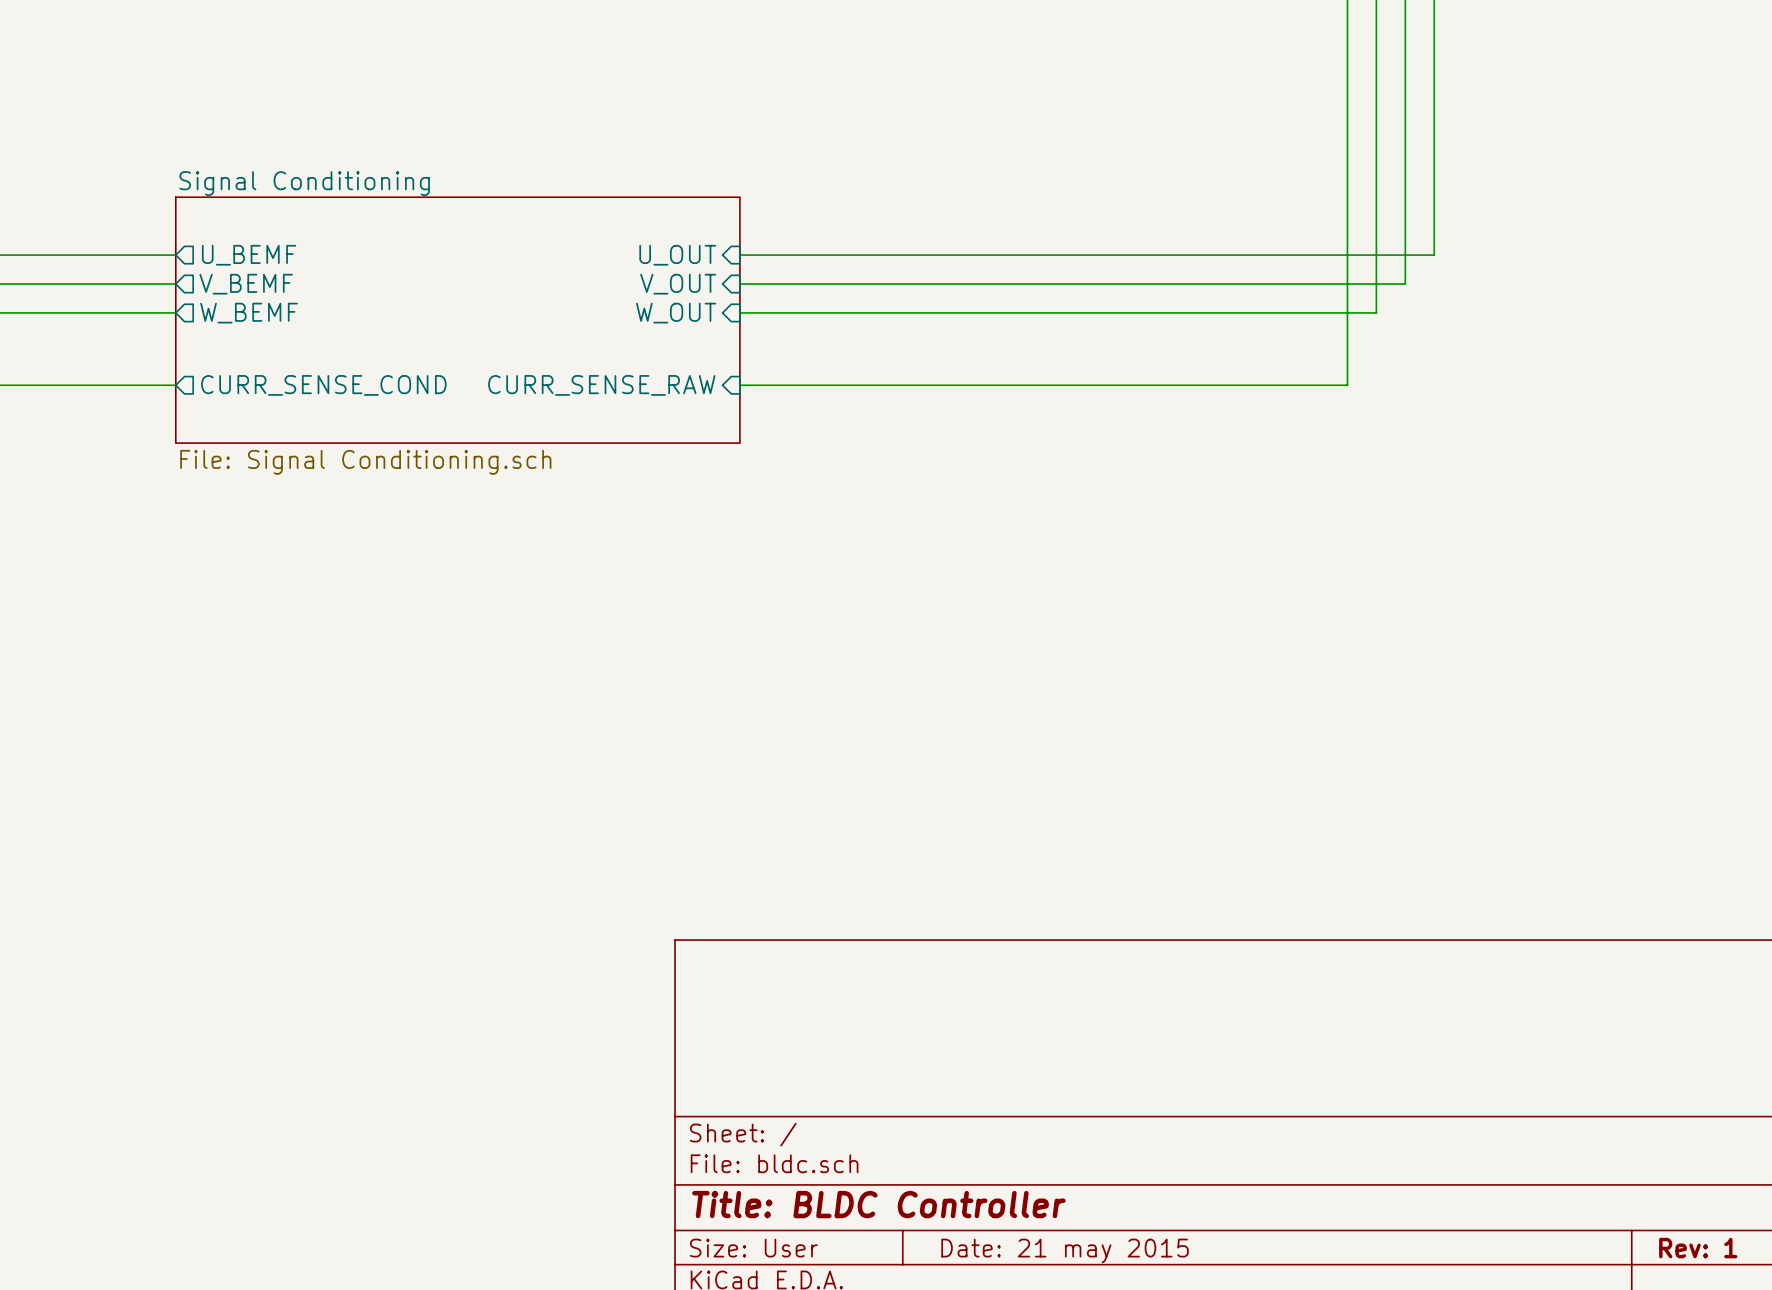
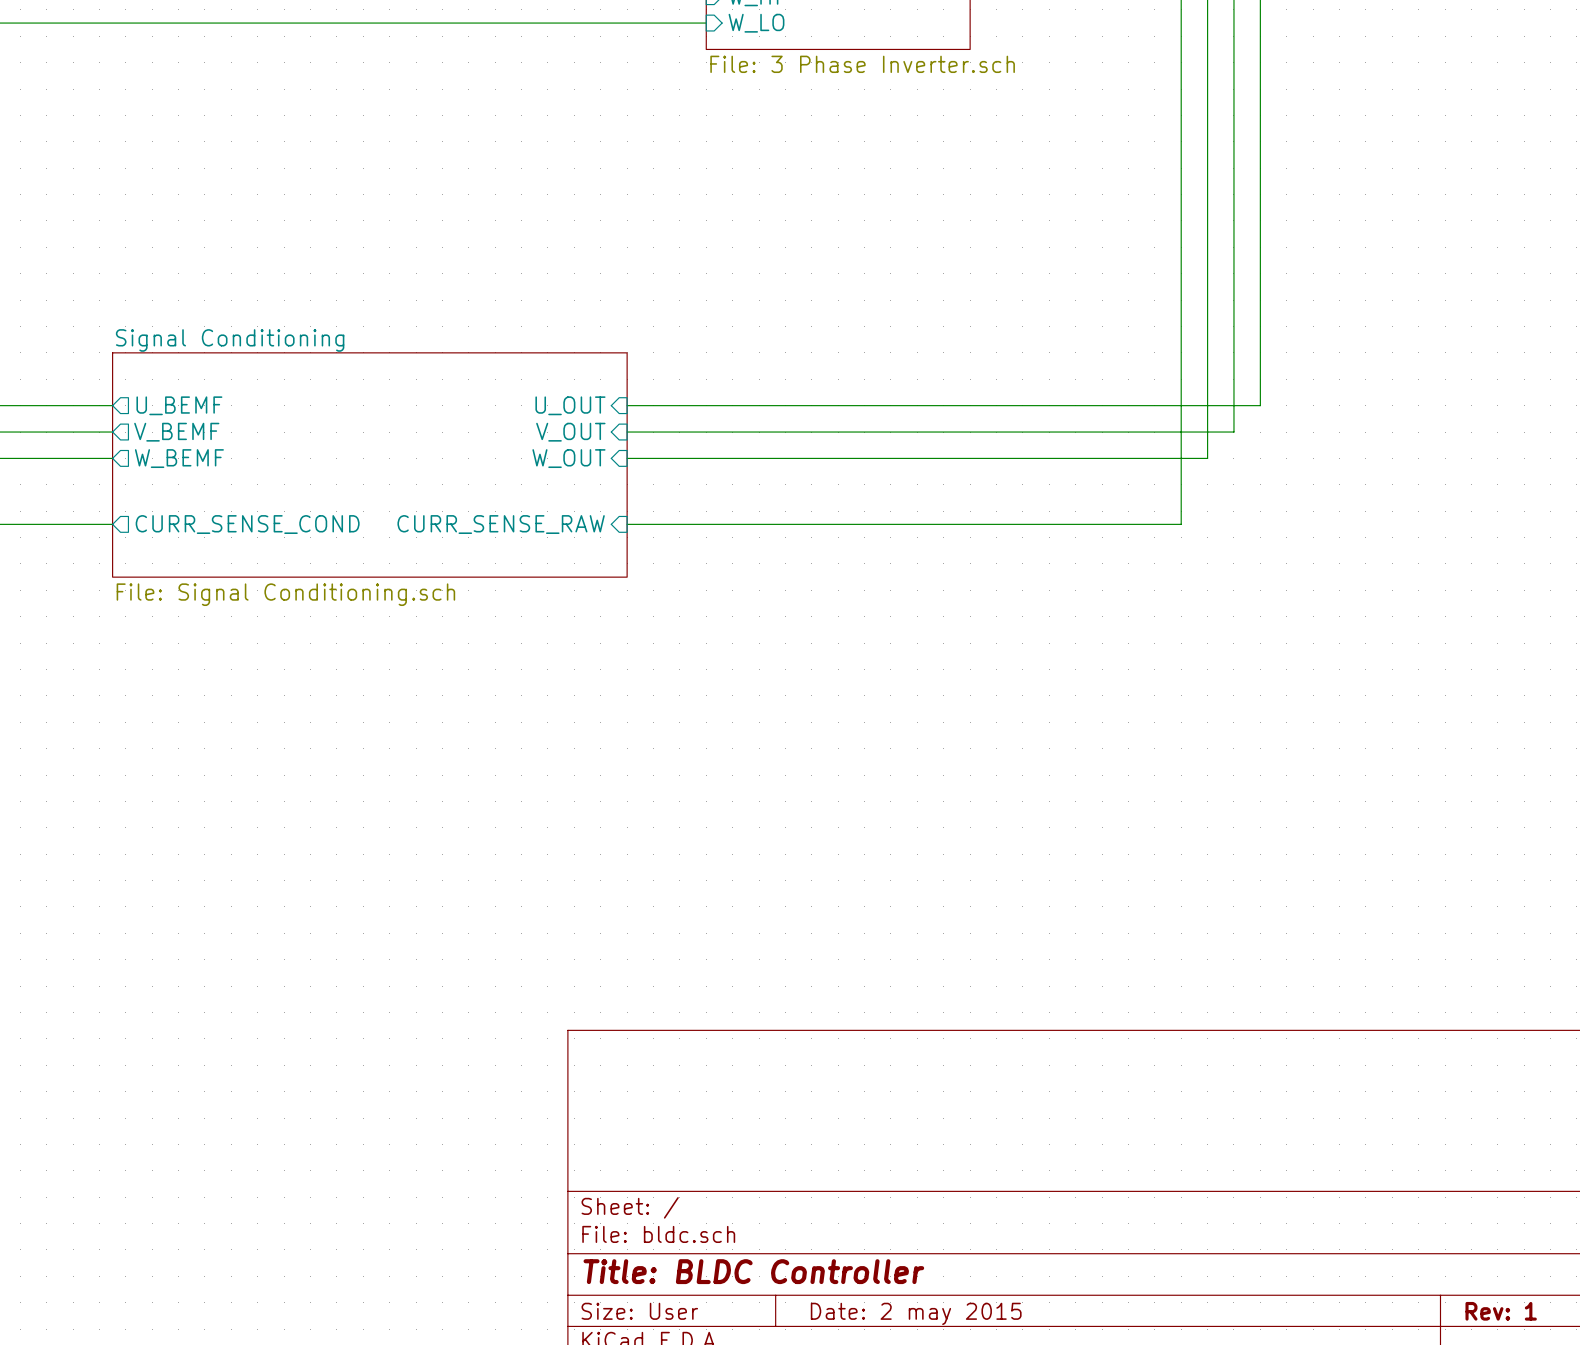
title block: Date: 21 may 2015 (1065, 1250) -> Date: 2 may 2015 (916, 1313)

